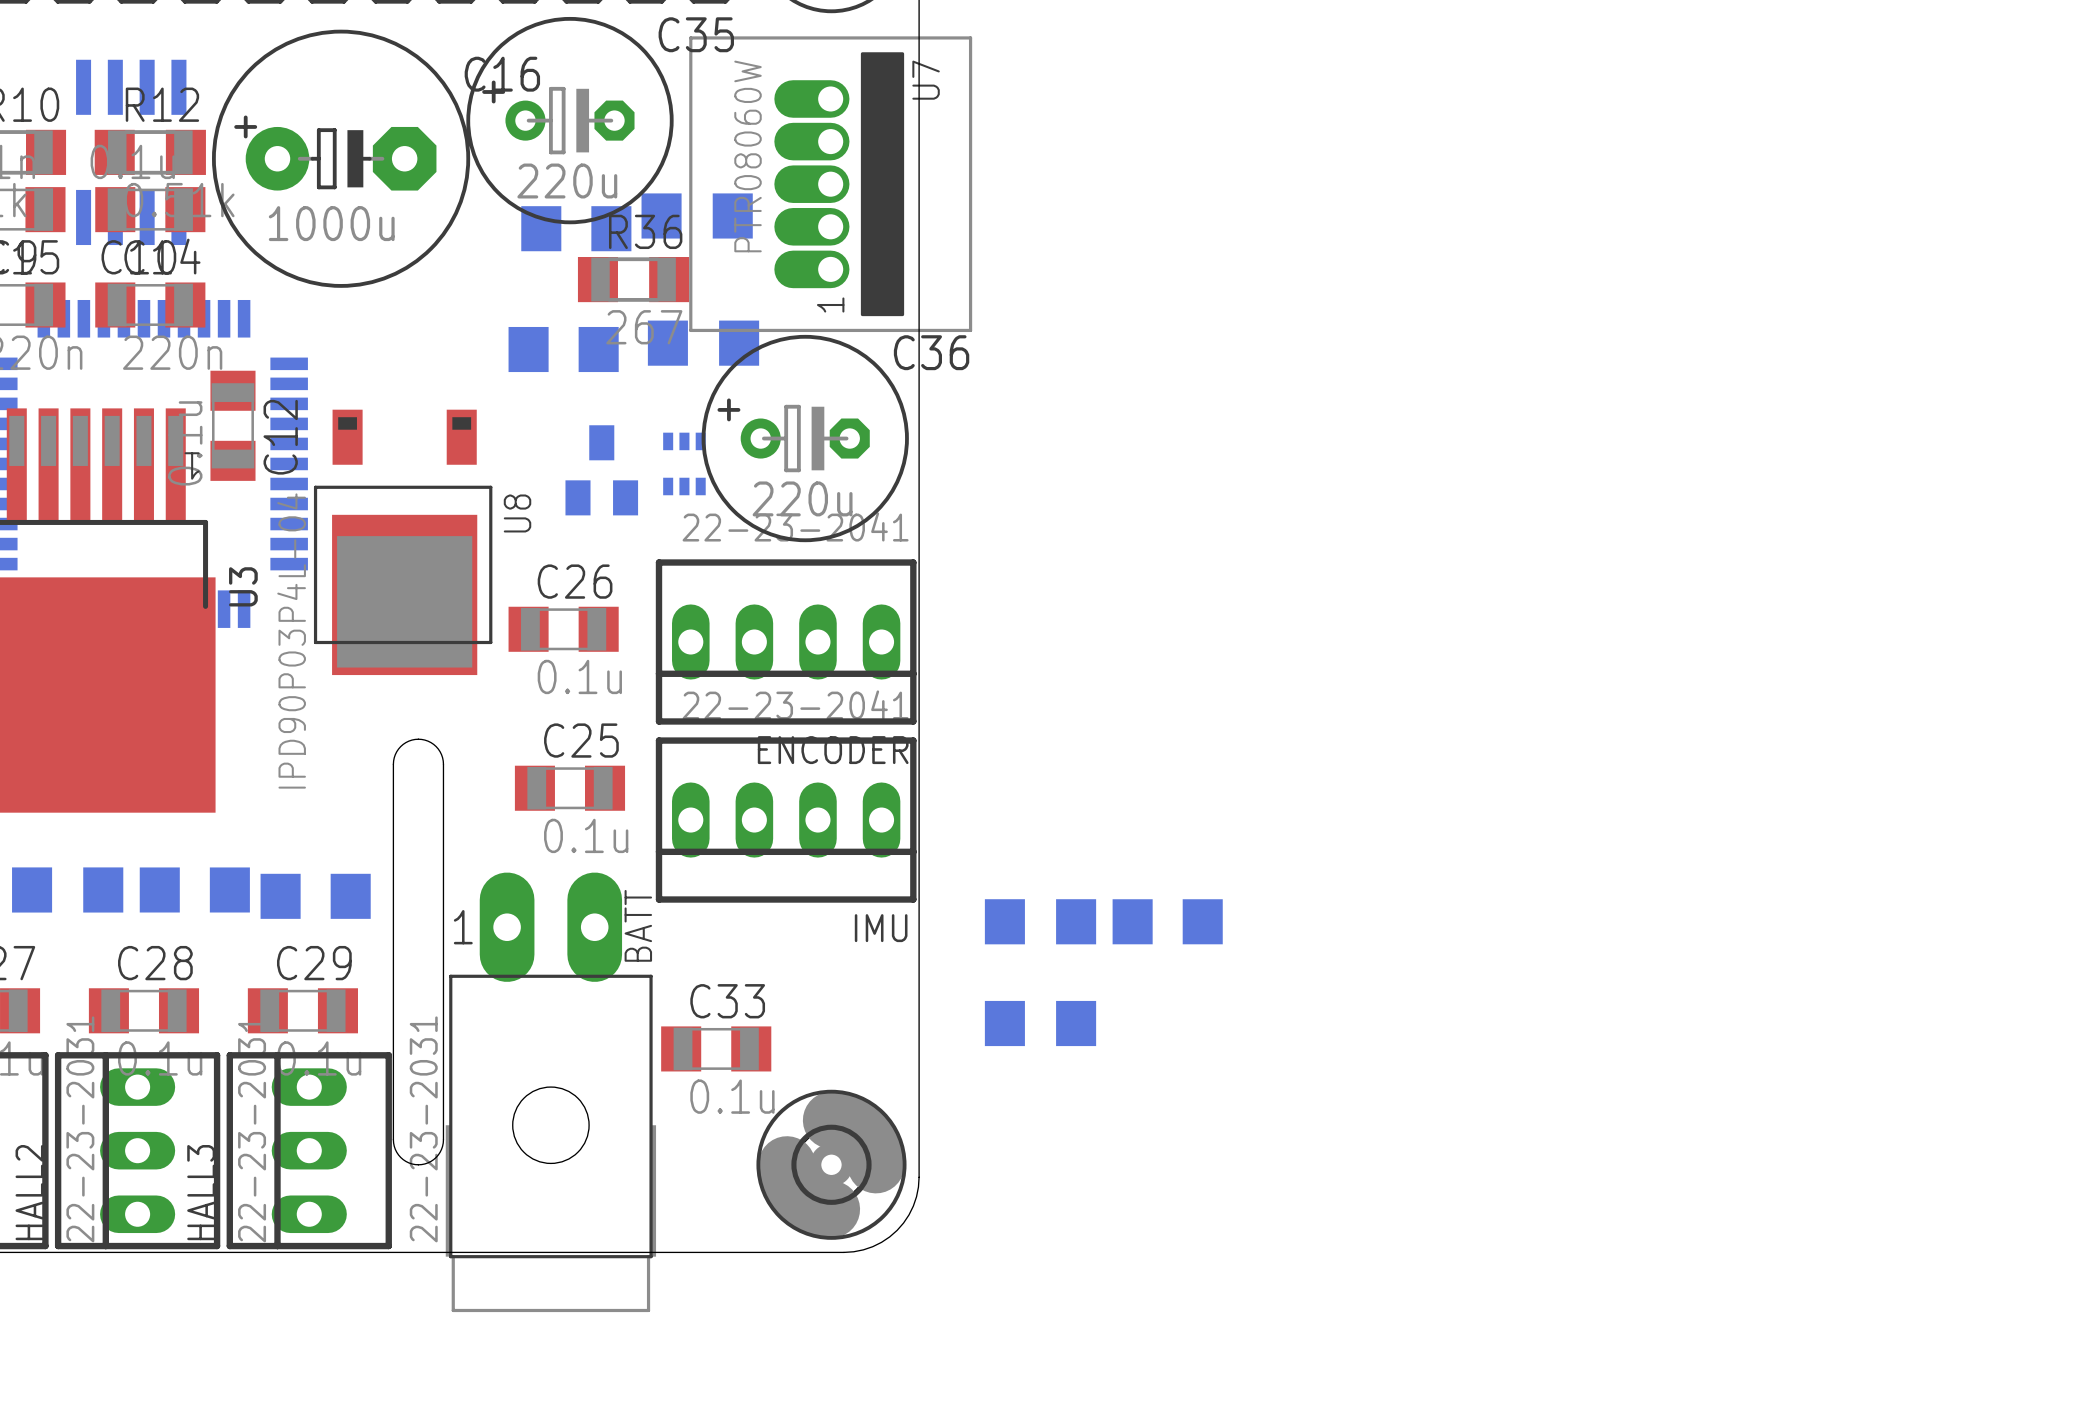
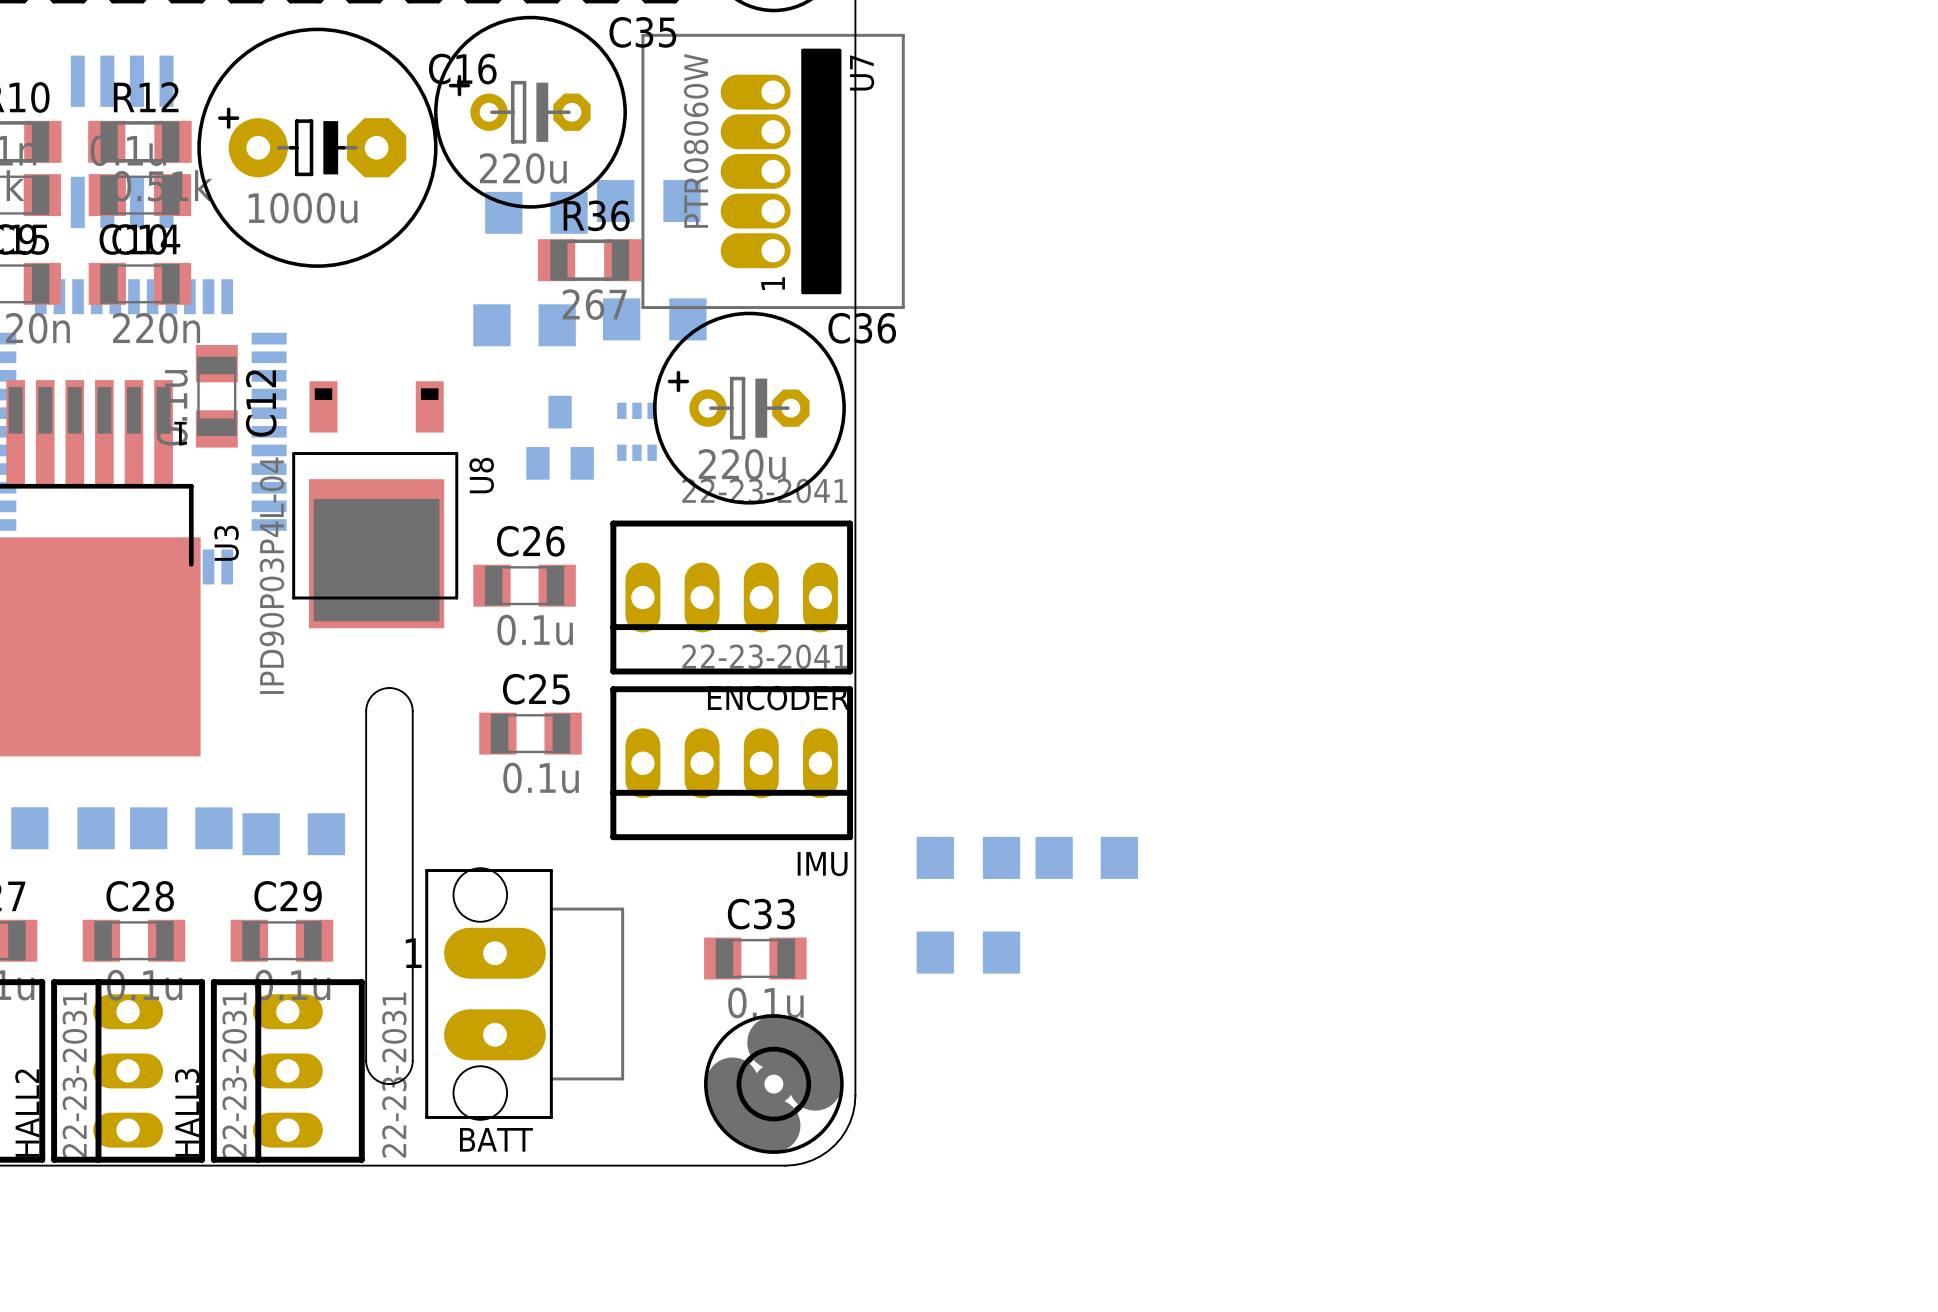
C33 position: (716, 1048) -> (755, 958)
BATT: none -> (524, 994)
BATT: (550, 1092) -> none

